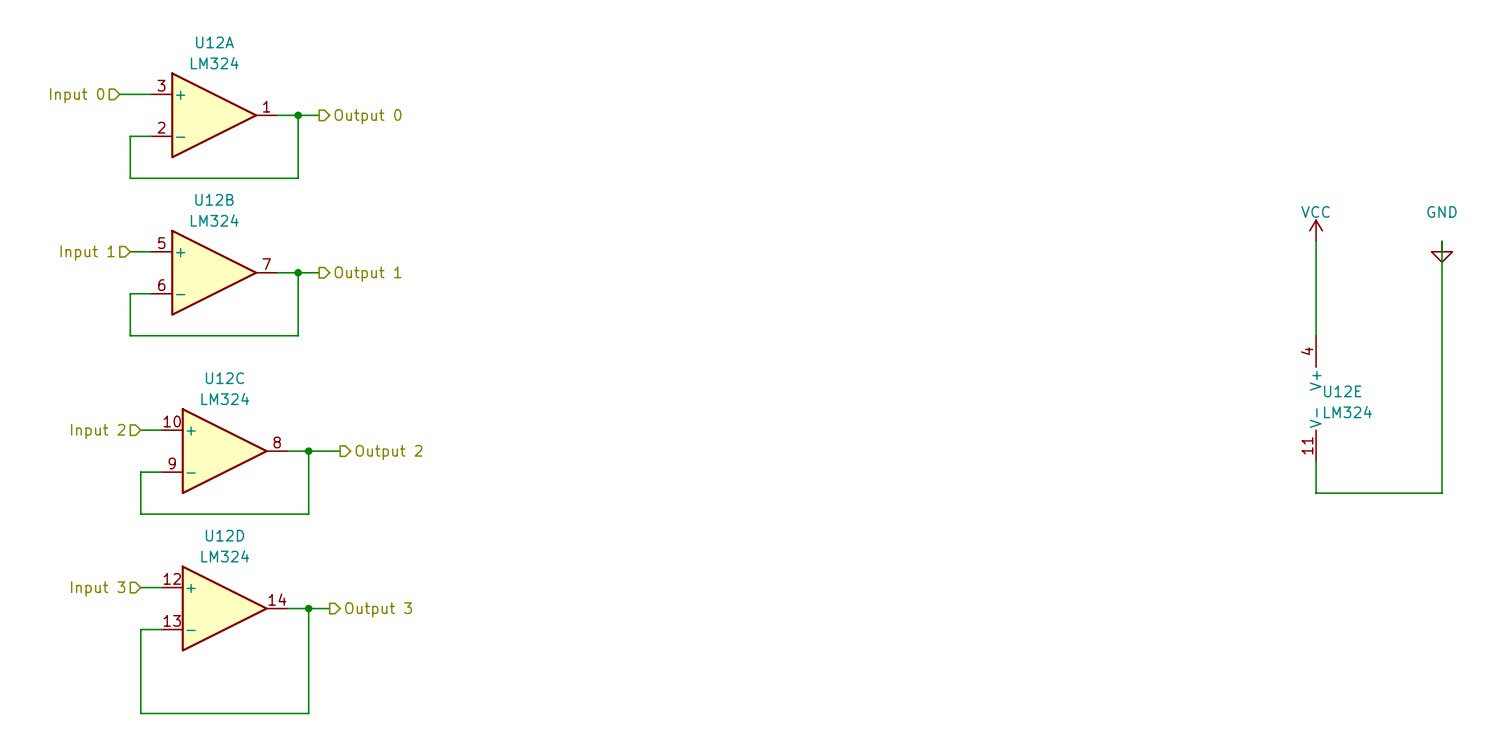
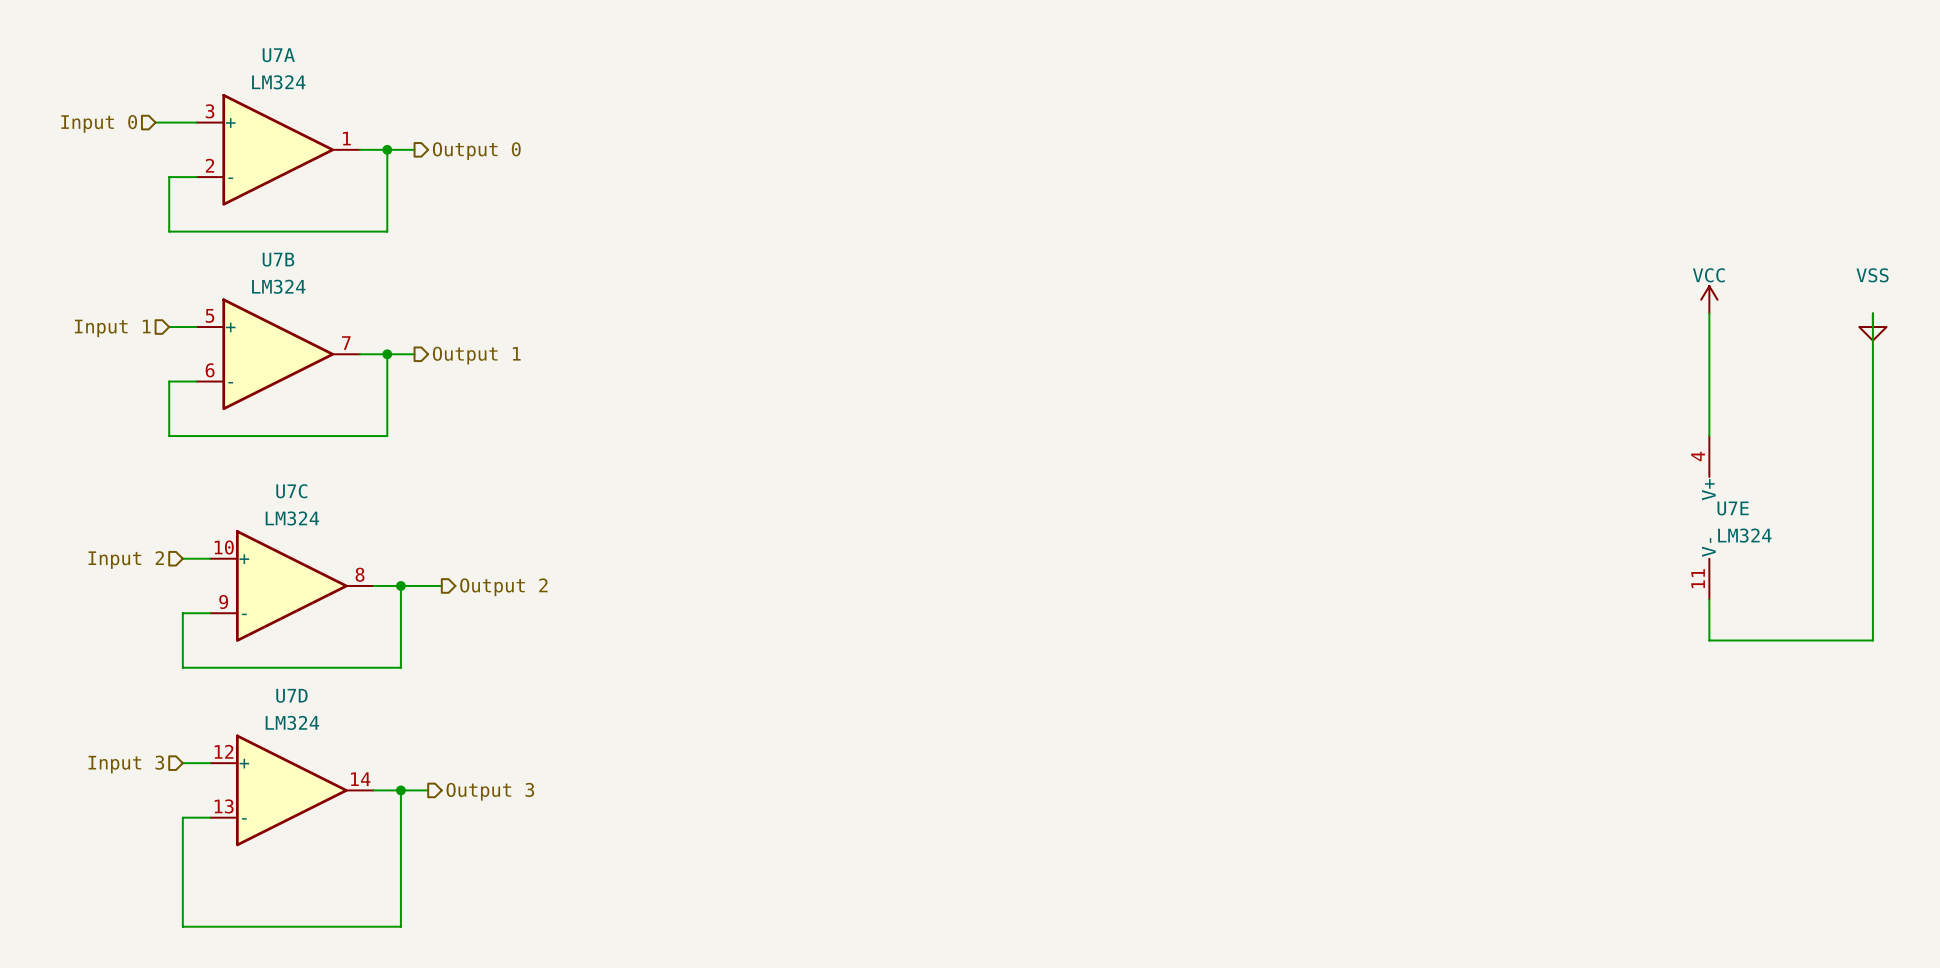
U12A name: U12A (214, 42) -> U7A (278, 55)
U12B name: U12B (214, 199) -> U7B (278, 259)
power symbol: GND (1441, 251) -> VSS (1872, 327)
U12C name: U12C (224, 378) -> U7C (291, 491)
U12E name: U12E (1342, 391) -> U7E (1733, 508)
U12D name: U12D (224, 535) -> U7D (291, 695)

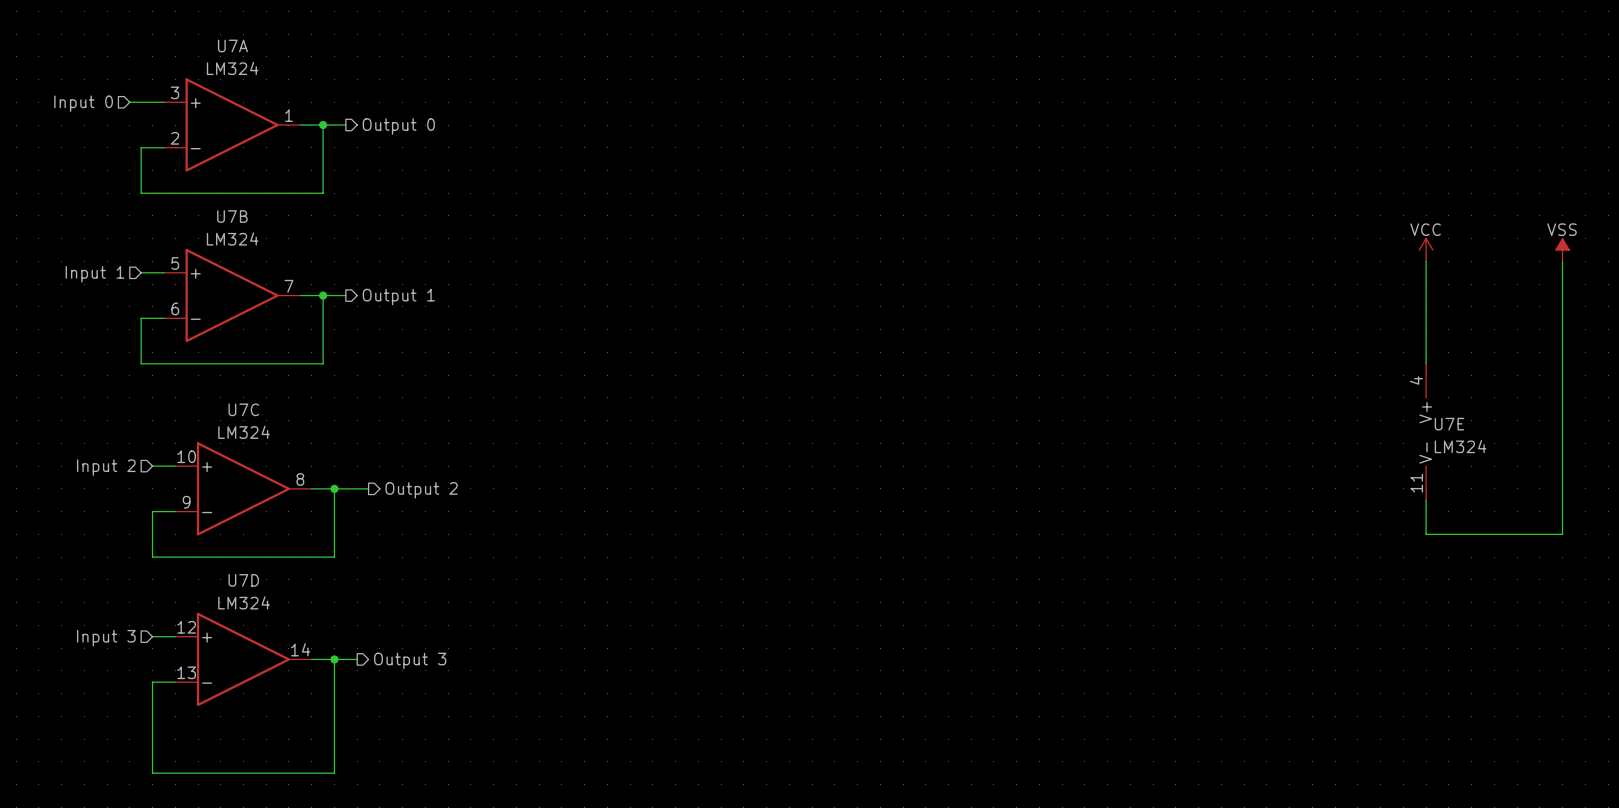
power symbol: none -> VSS (1562, 250)
power symbol: VSS (1872, 327) -> none

